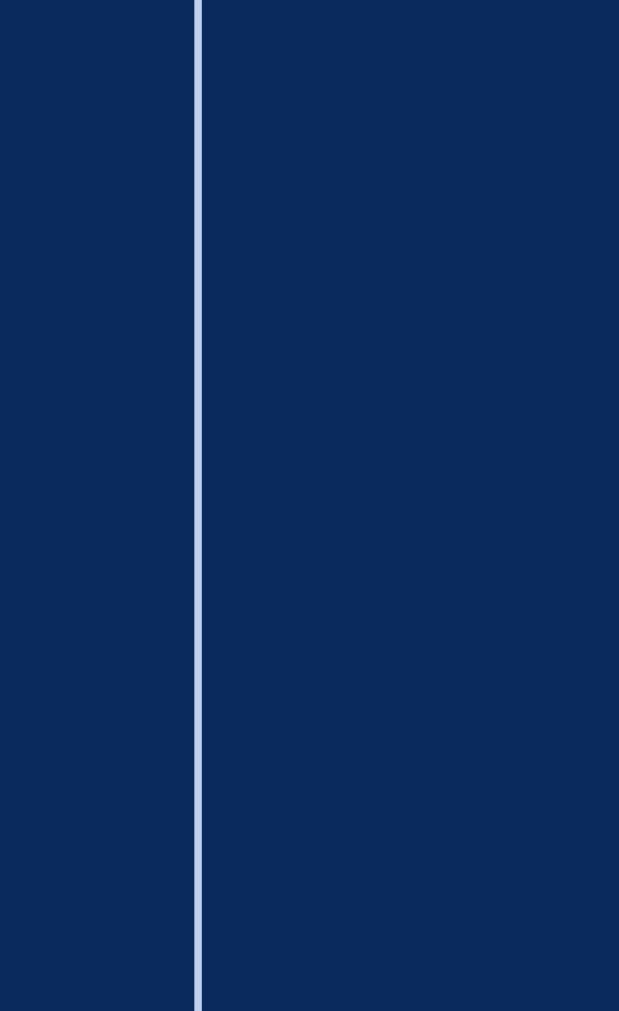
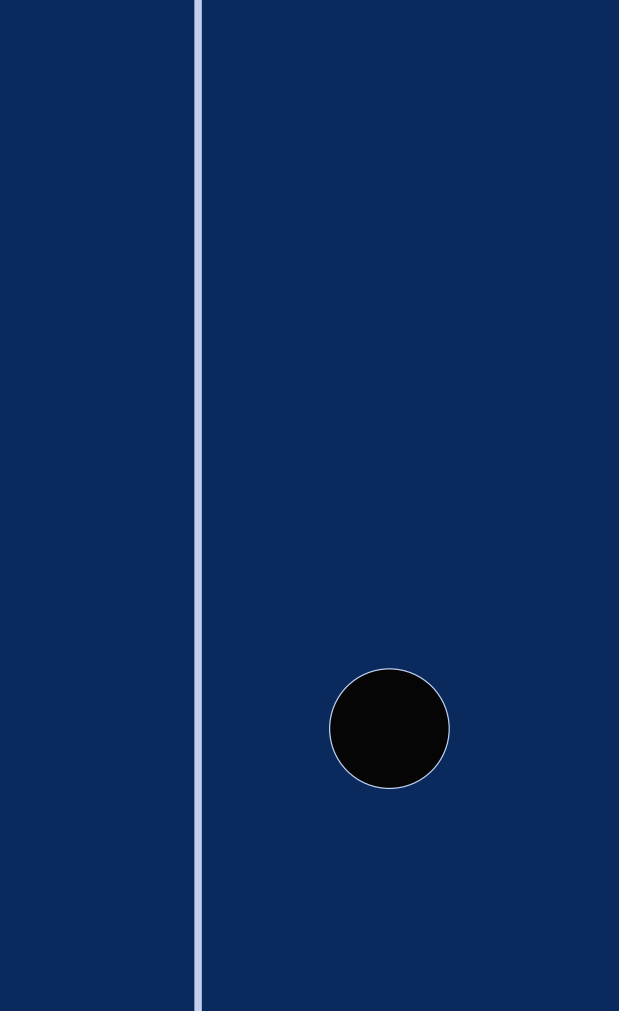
part: none -> (389, 728)

